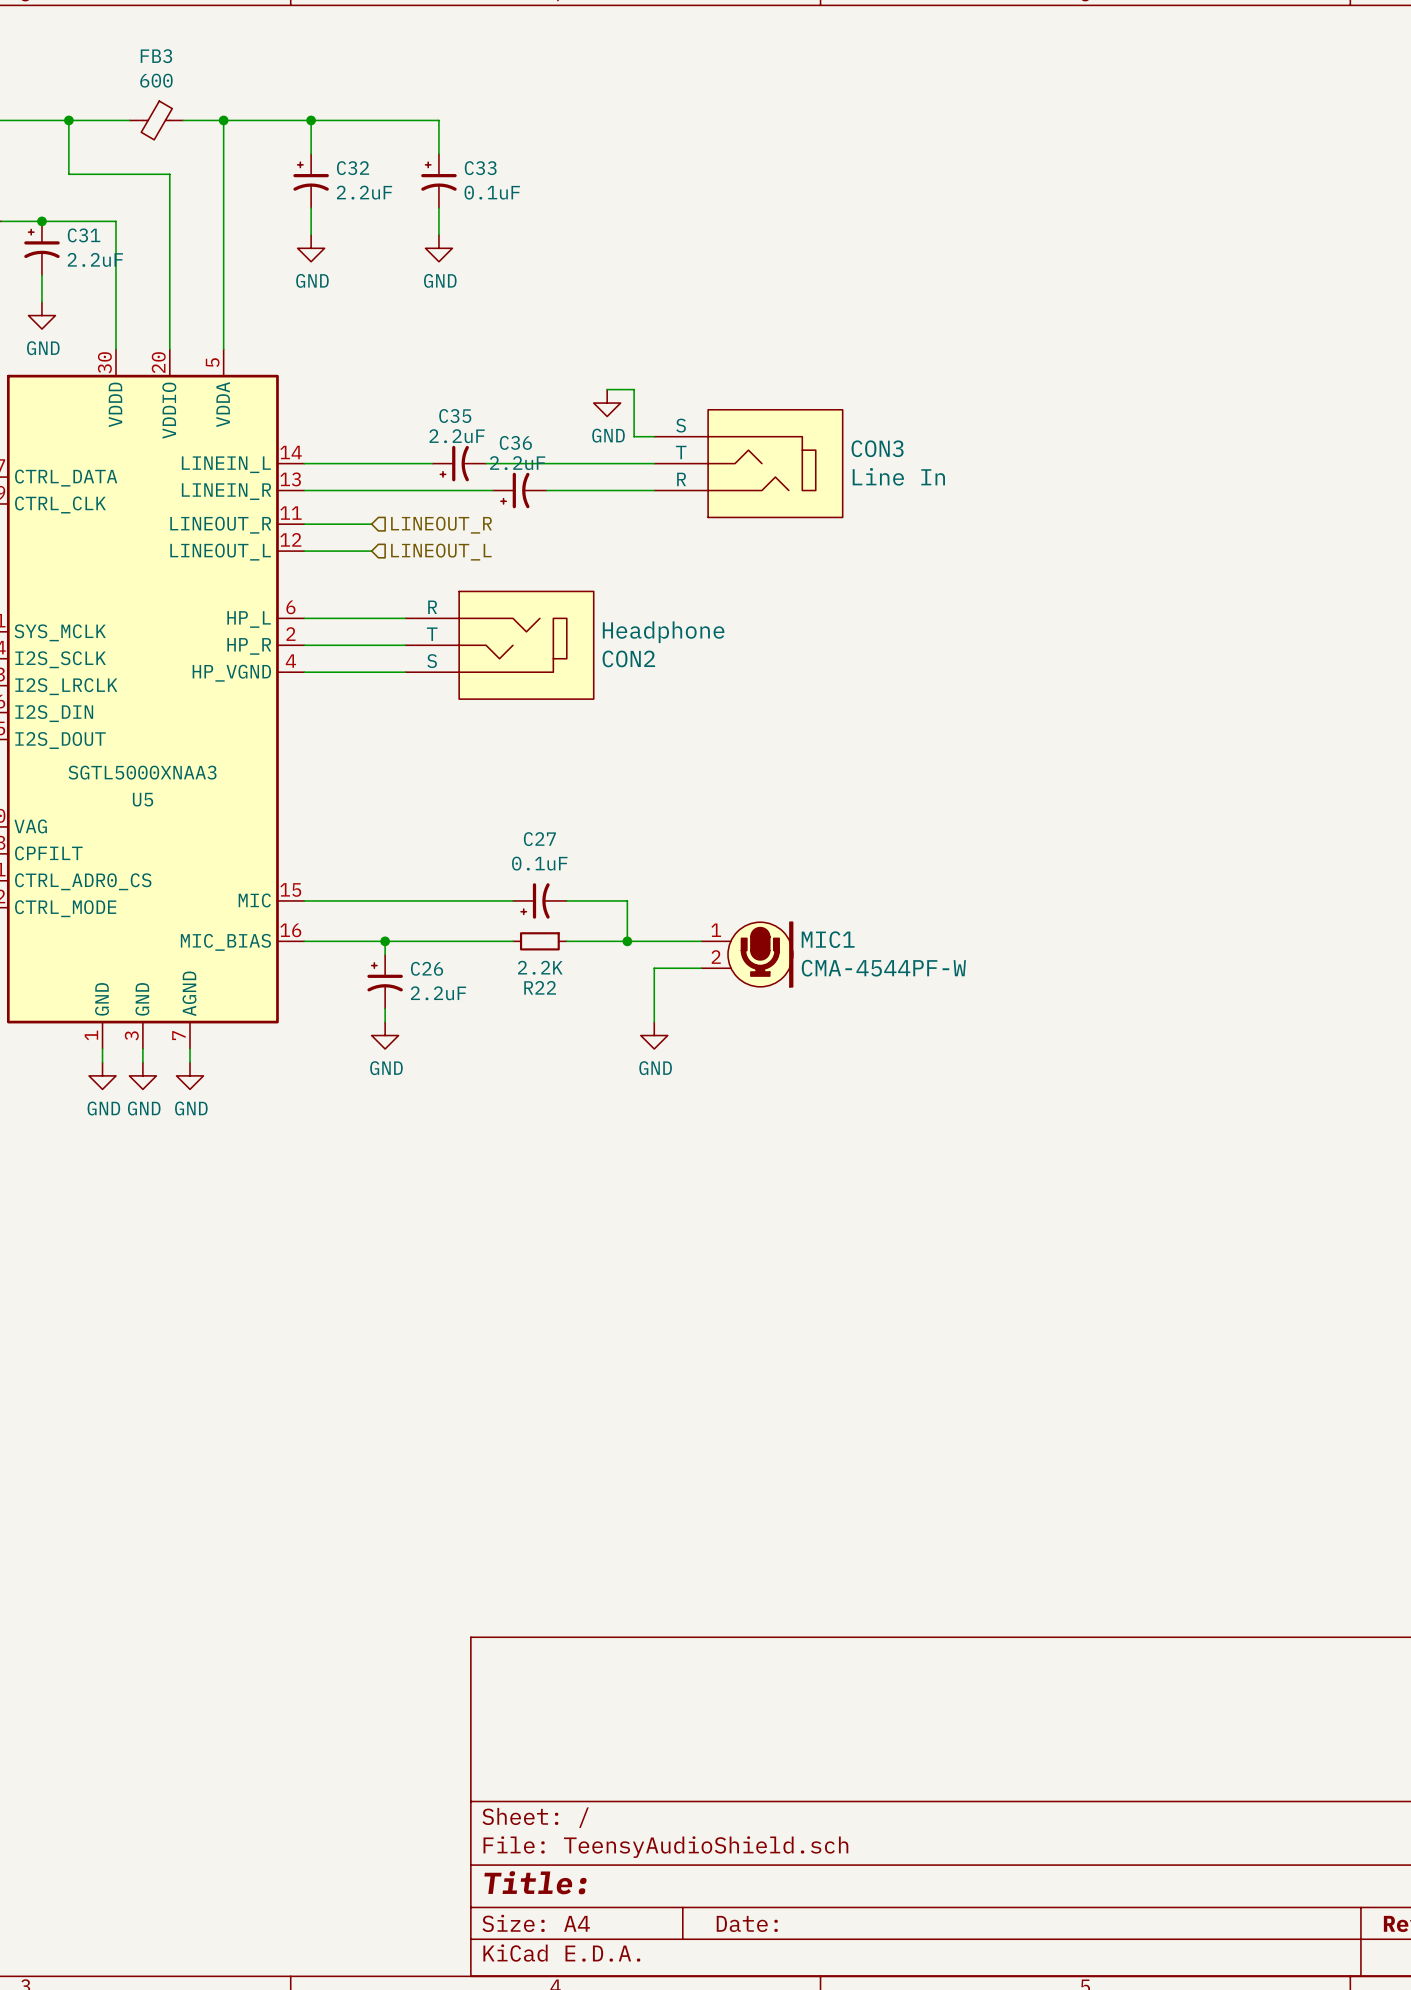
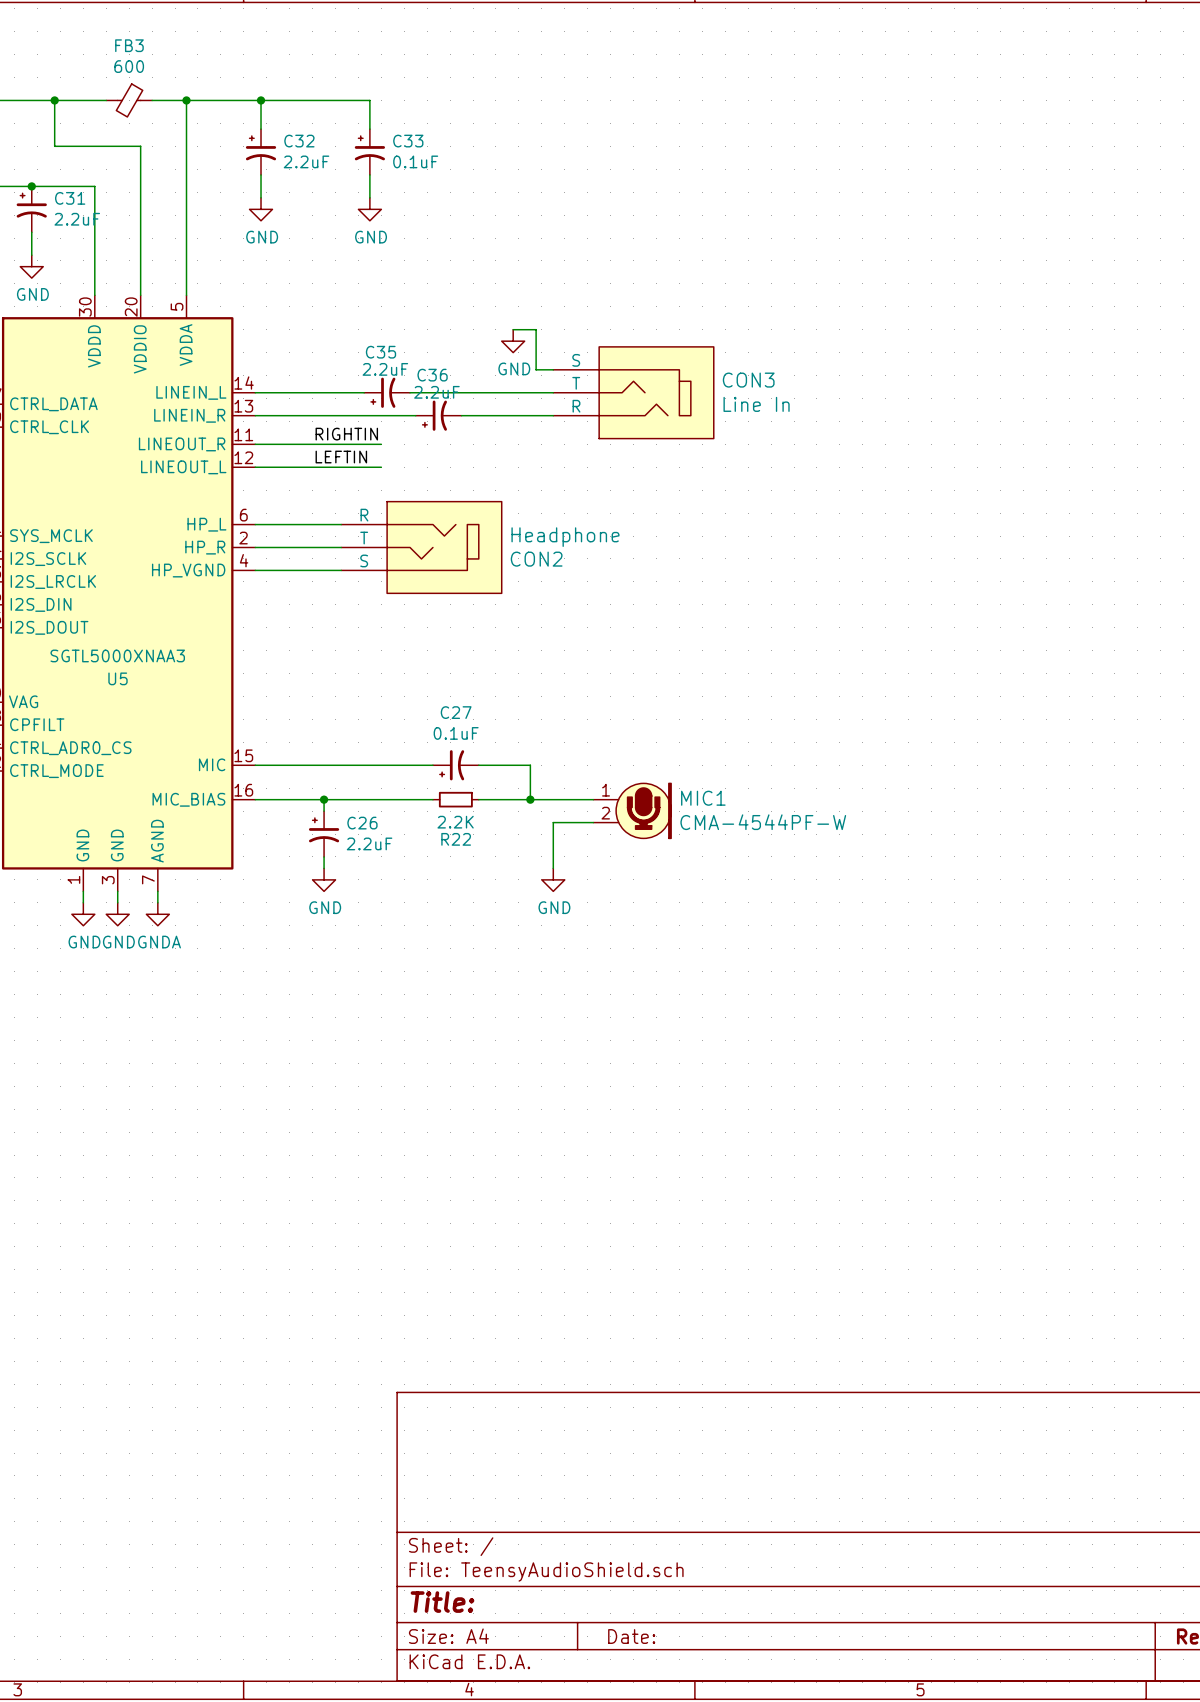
label: none -> RIGHTIN (346, 434)
wire: none -> (312, 444) (381, 444)
hierarchical label: LINEOUT_R (441, 525) -> none
label: none -> LEFTIN (341, 457)
wire: none -> (312, 467) (381, 467)
hierarchical label: LINEOUT_L (441, 552) -> none
power symbol: GND (190, 1075) -> GNDA (157, 914)

